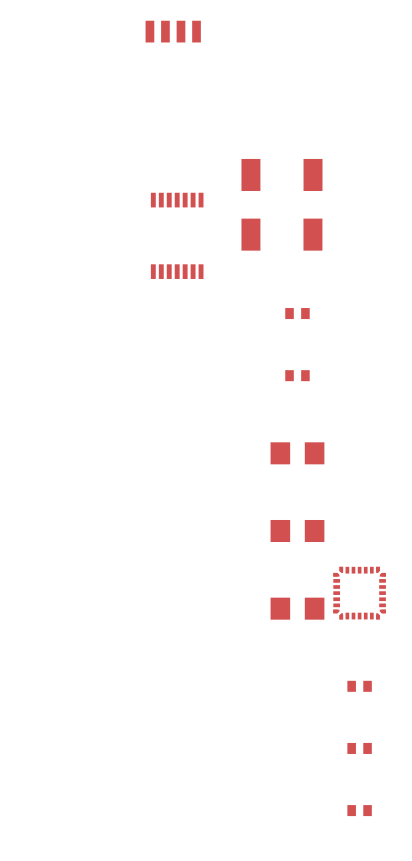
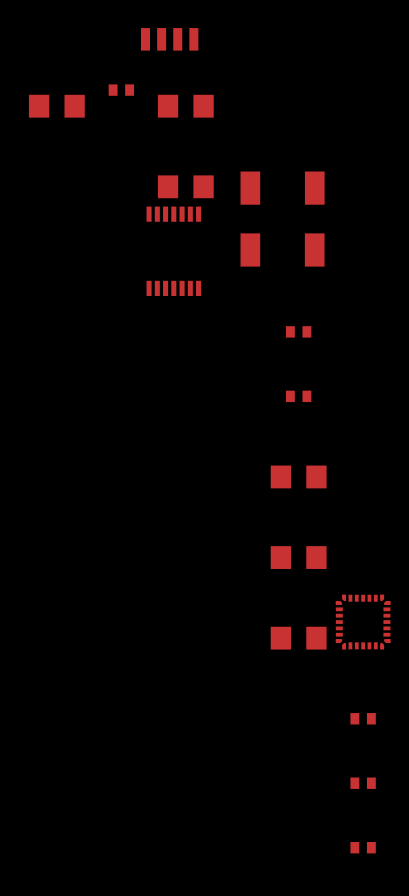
part: none -> (121, 90)
part: none -> (56, 106)
part: none -> (185, 106)
part: none -> (185, 186)

